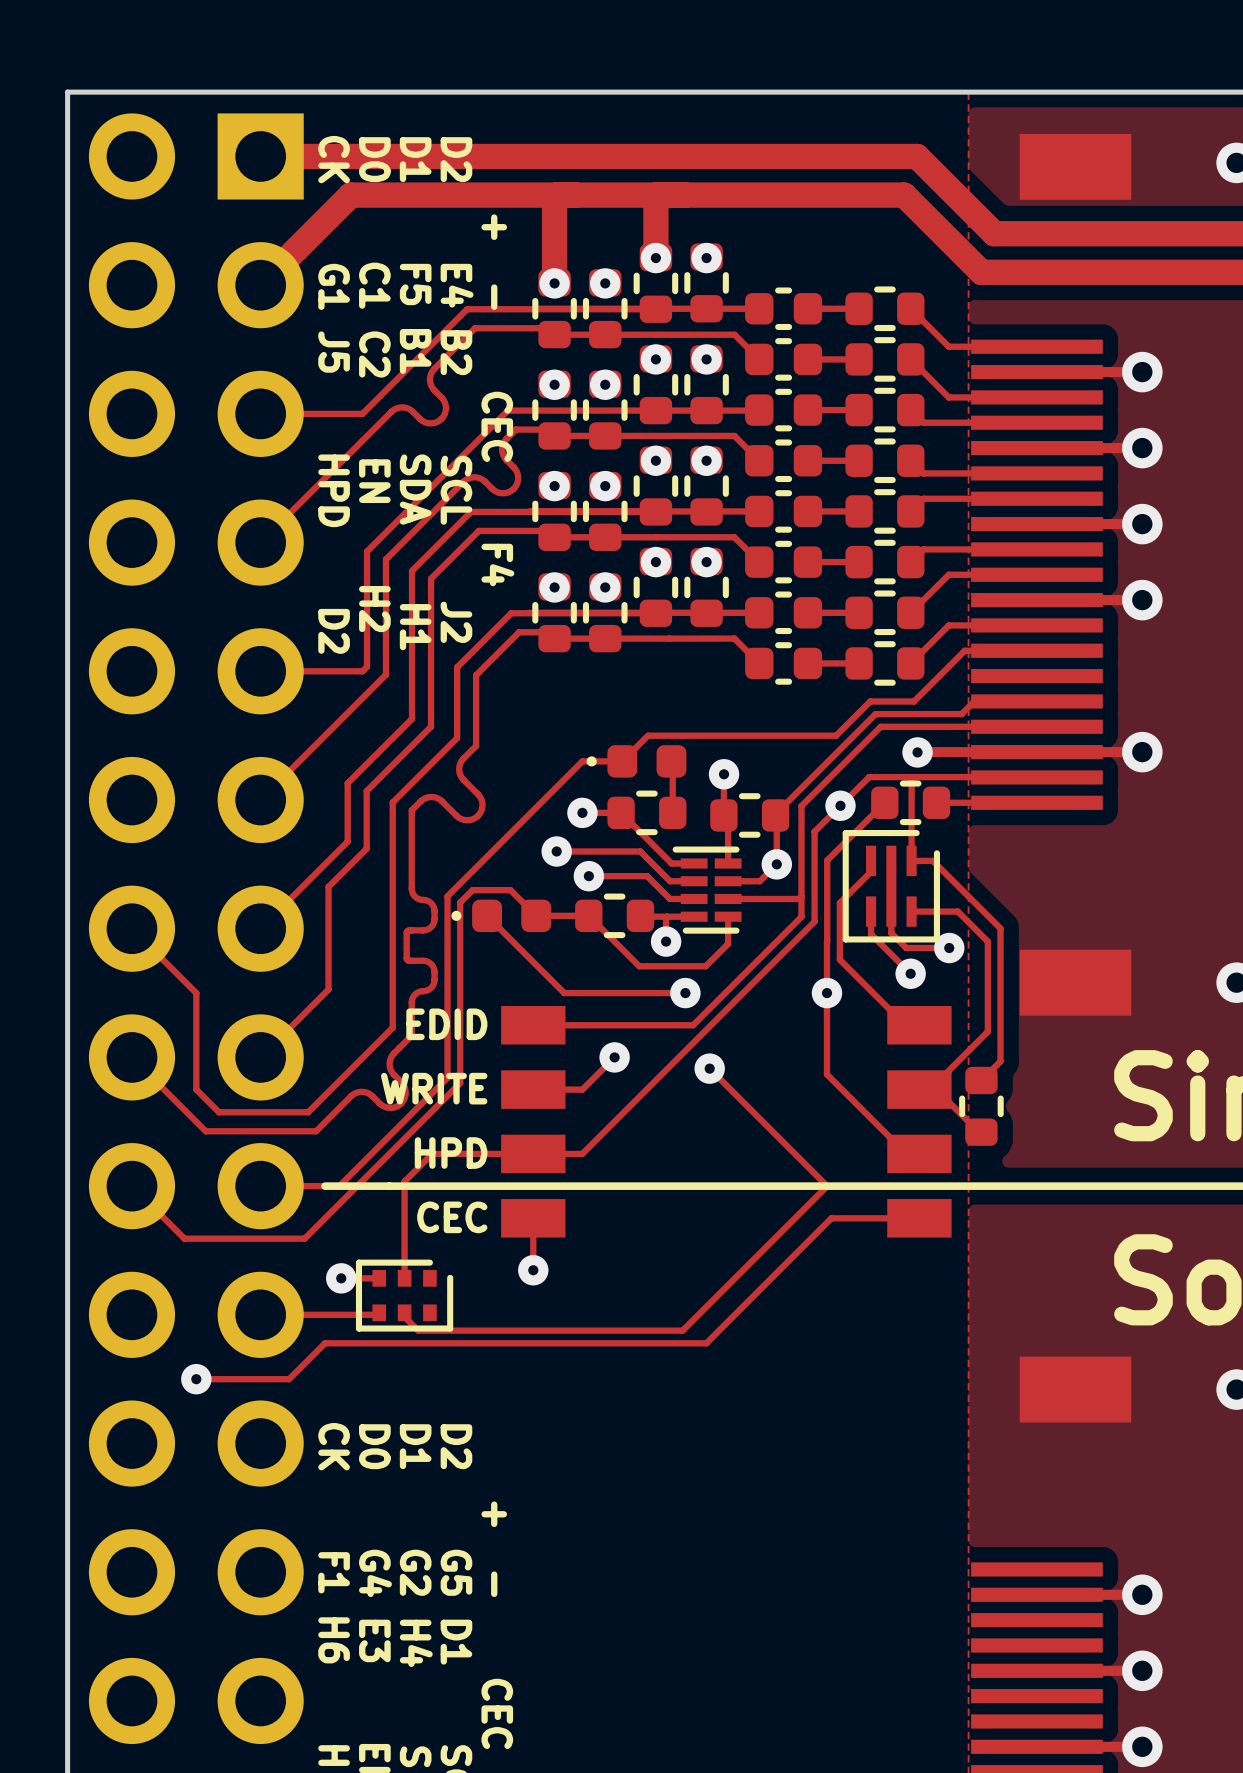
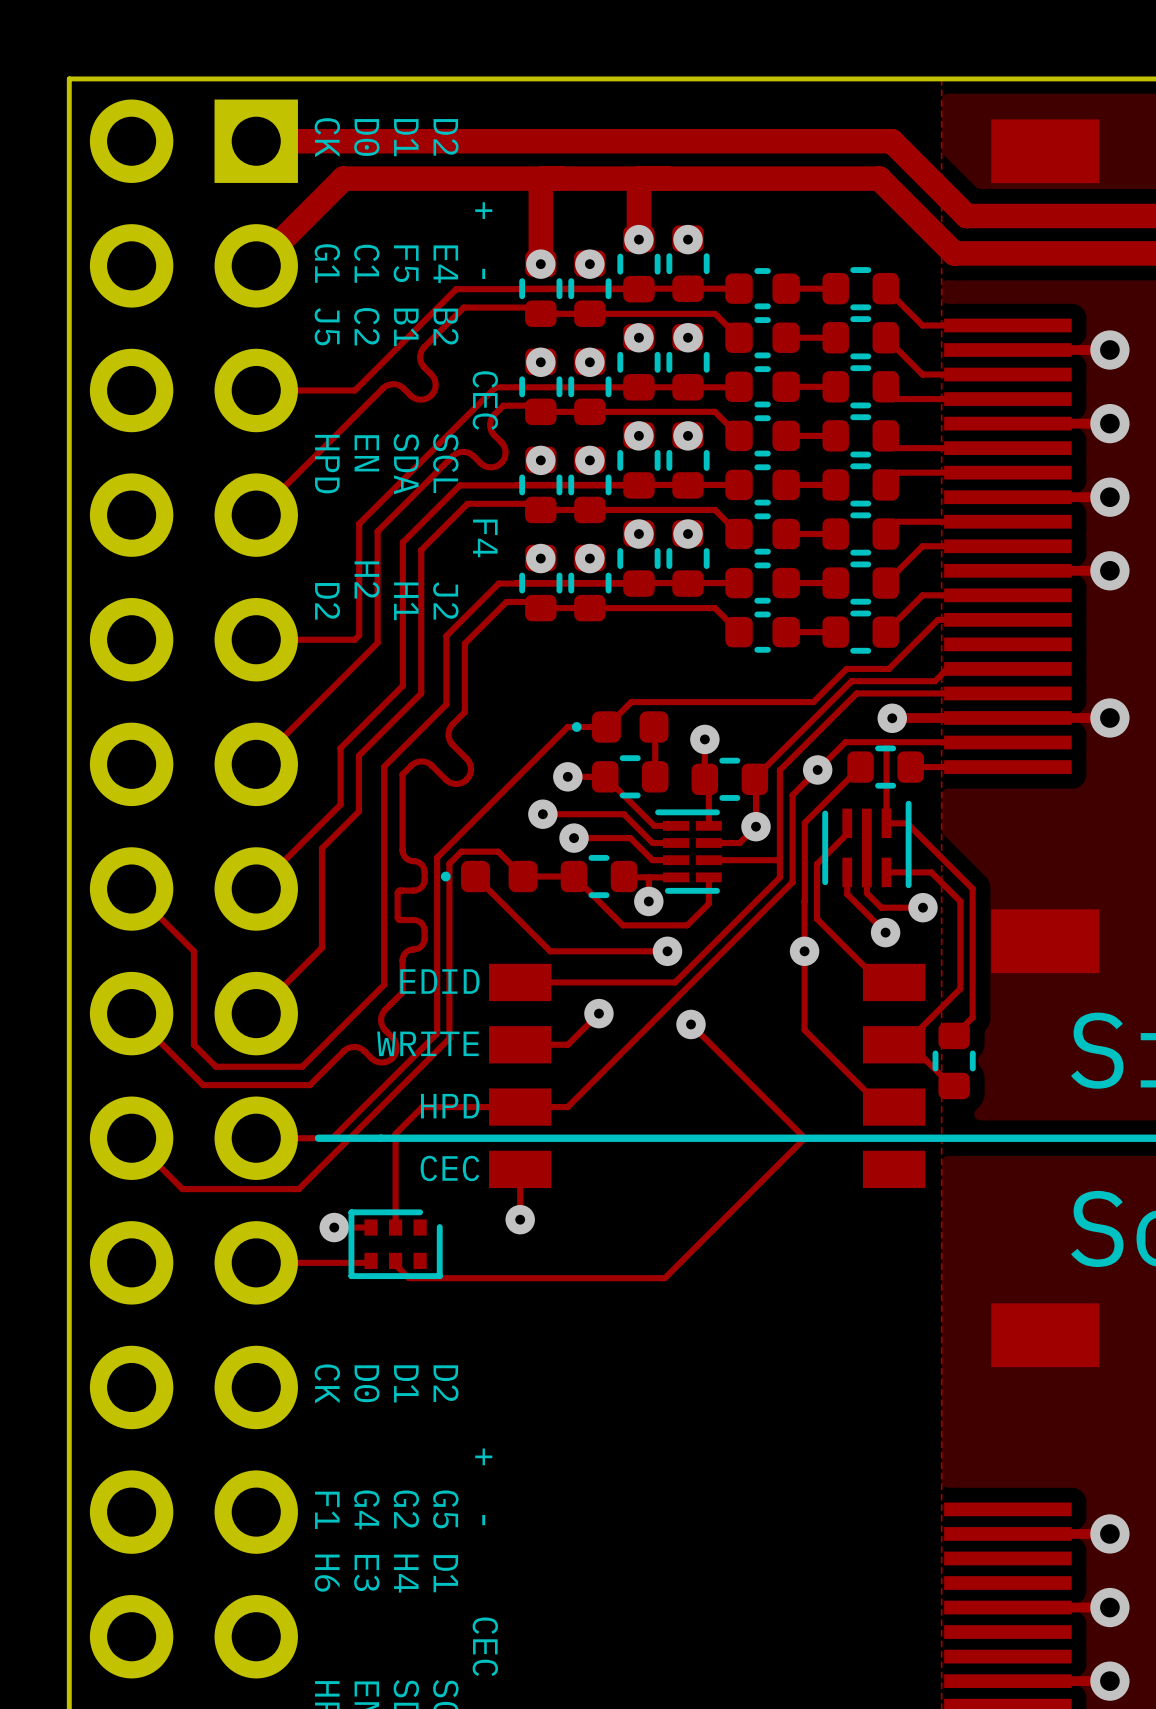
part footprint: [842, 830, 940, 943] -> [822, 800, 912, 889]
track: (919, 1218) (831, 1218) (706, 1343) (325, 1343) (289, 1379) (196, 1379) -> none
via: (196, 1379) -> none

